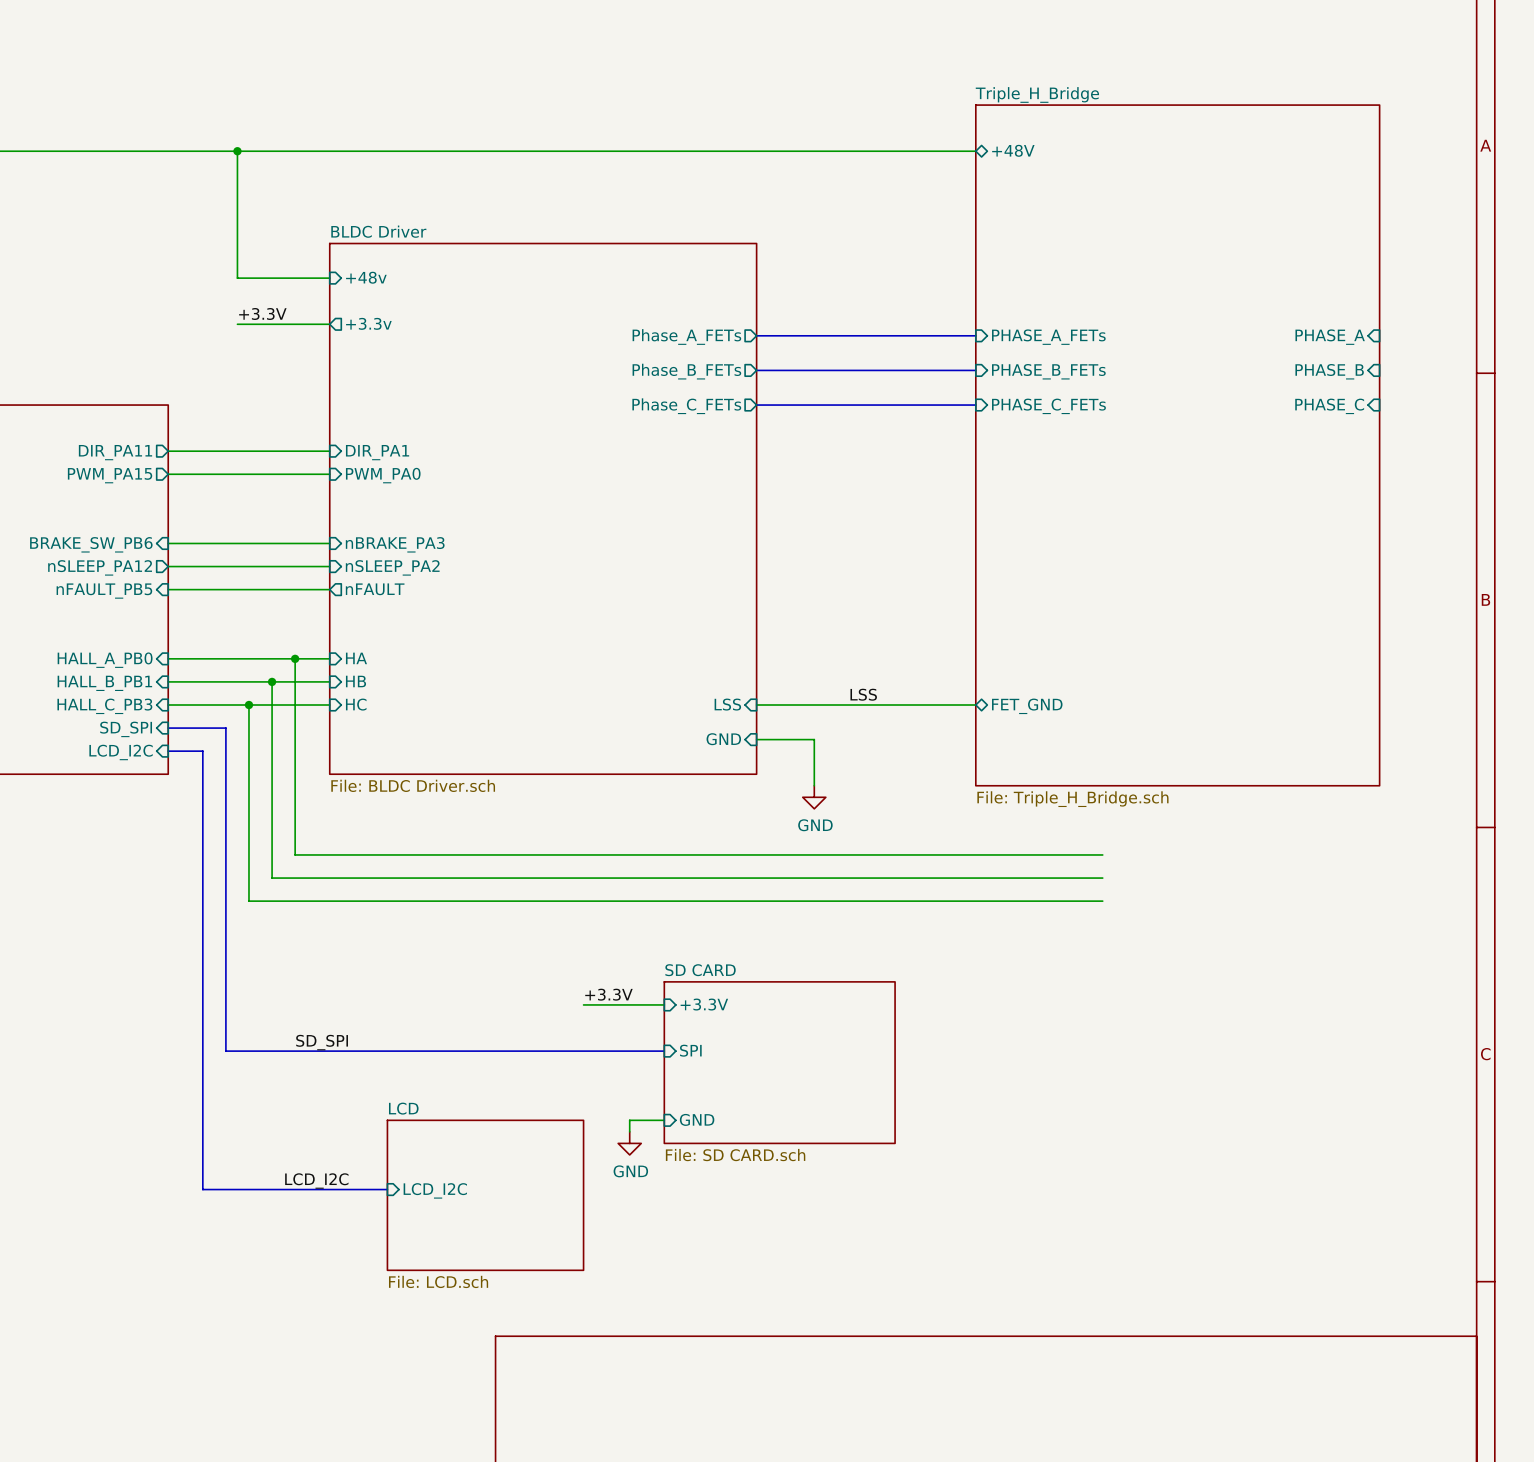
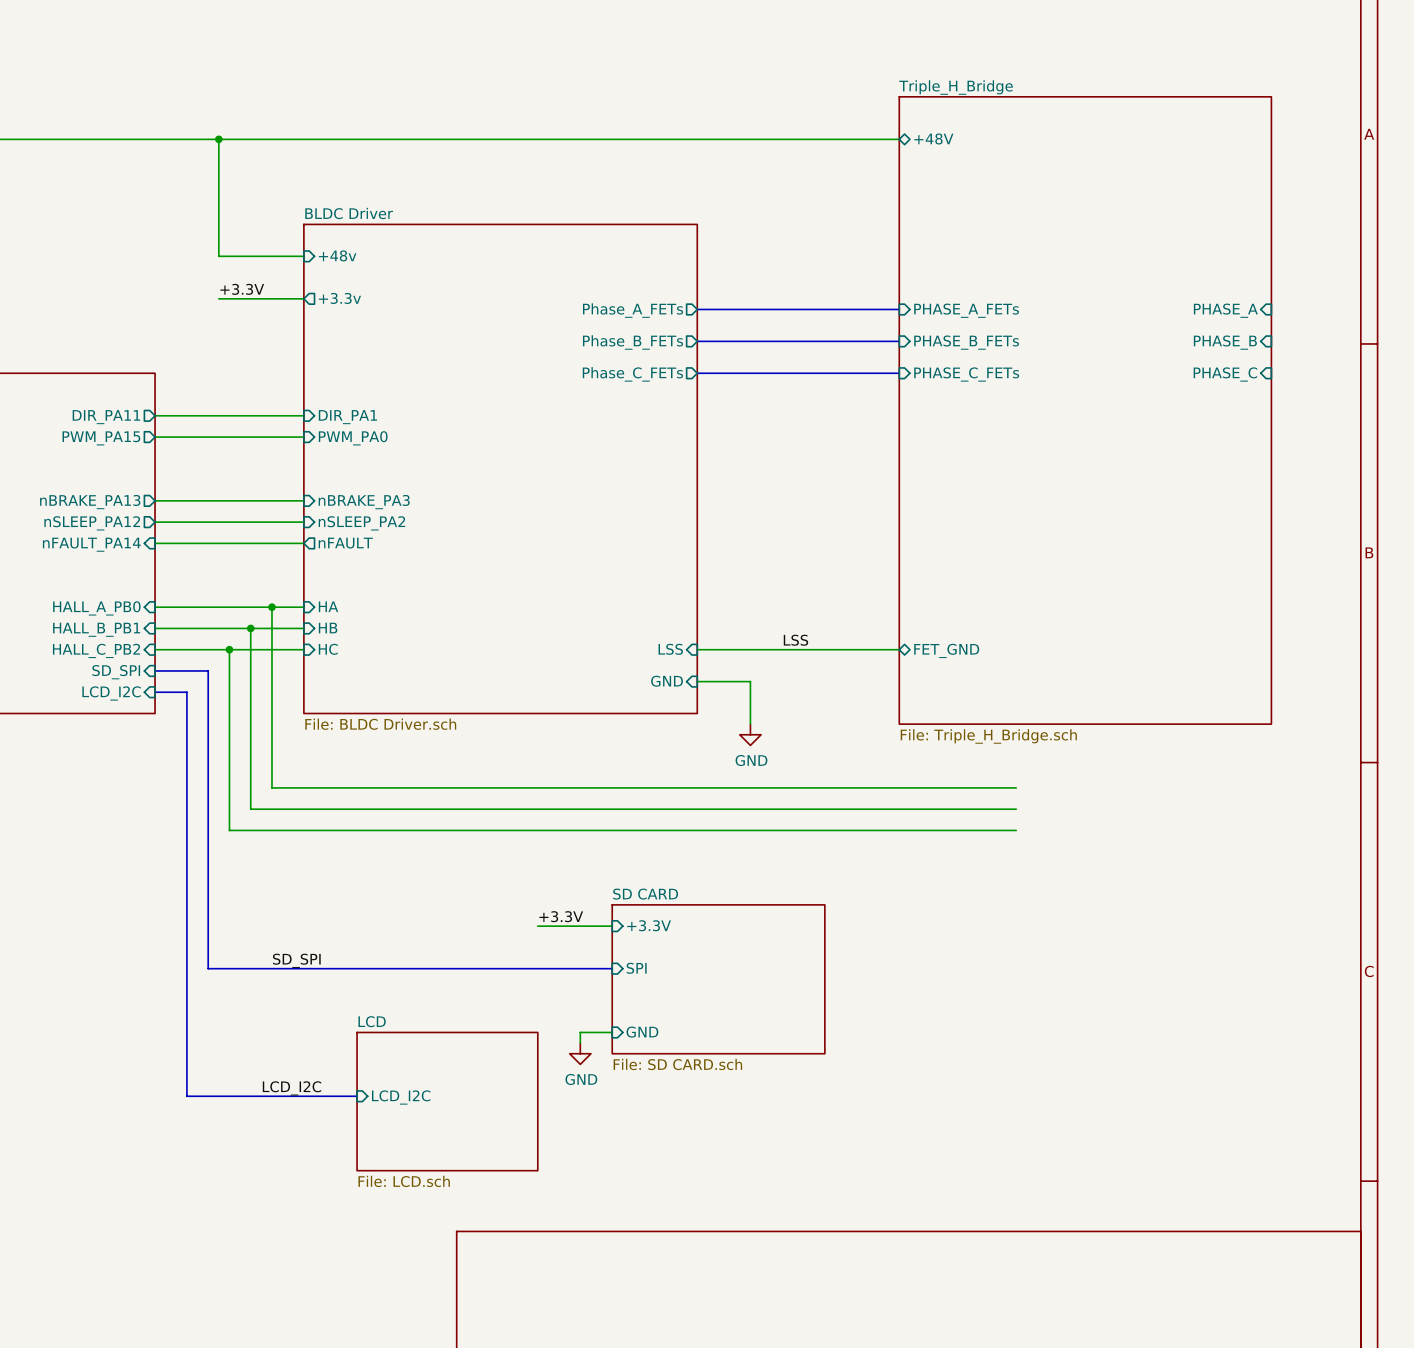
sheet pin shape: input (91, 544) -> output (90, 502)
sheet pin: BRAKE_SW_PB6 (91, 544) -> nBRAKE_PA13 (90, 502)
sheet pin: nFAULT_PB5 (104, 591) -> nFAULT_PA14 (91, 544)
sheet pin: HALL_C_PB3 (104, 706) -> HALL_C_PB2 (96, 650)

